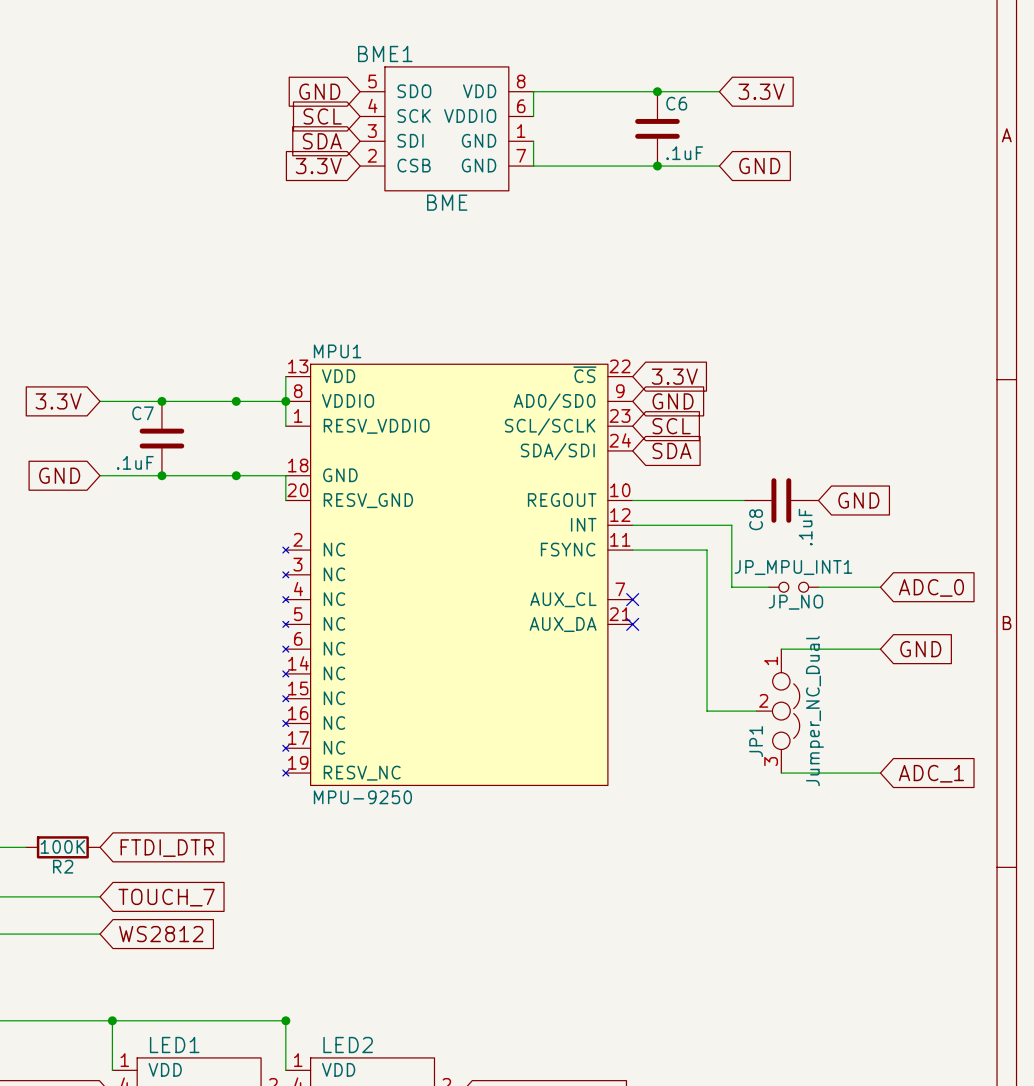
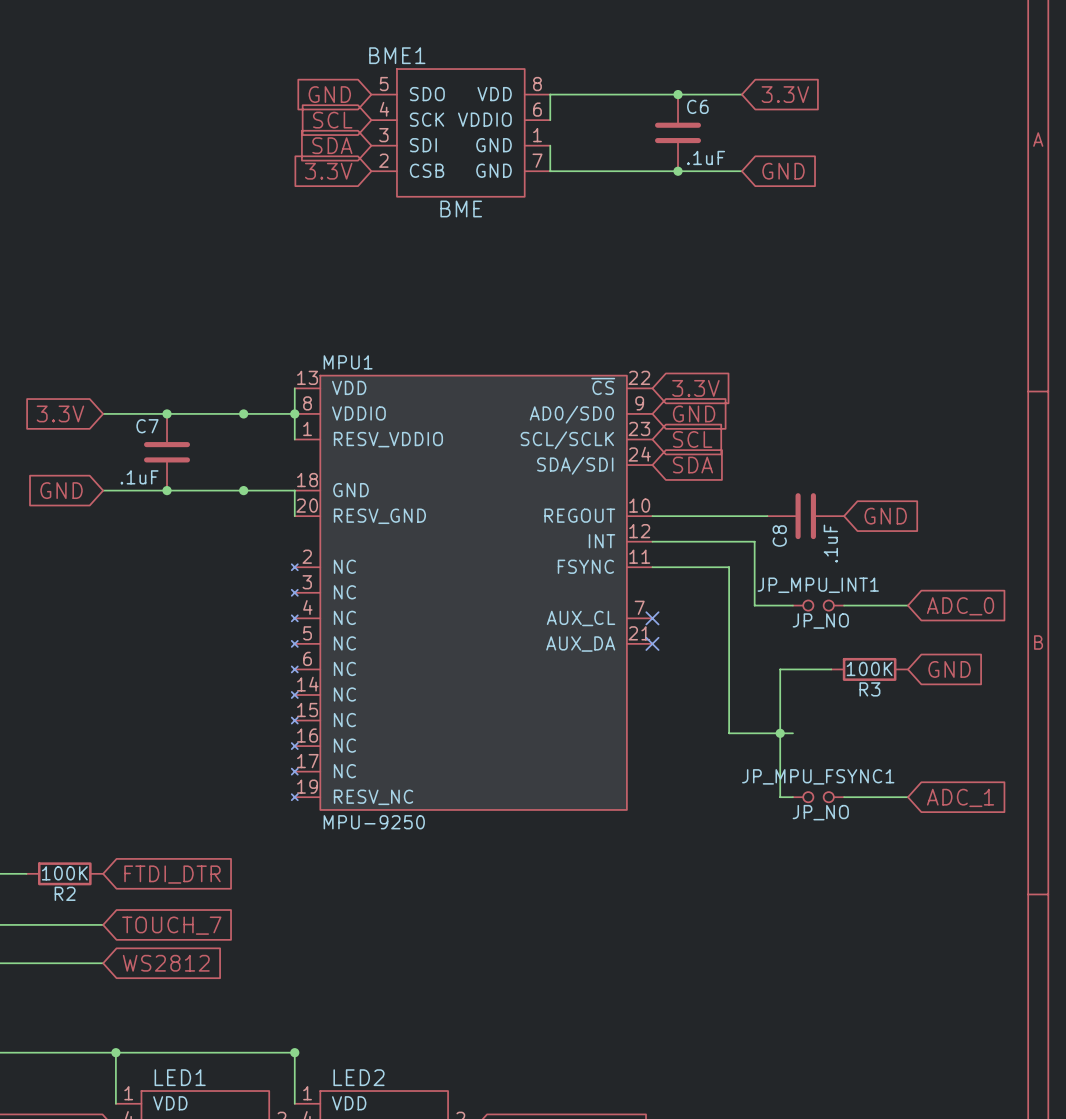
wire: none -> (805, 669) (780, 669) (780, 797) (792, 797)
R3: none -> 100K (869, 669)
junction: none -> (780, 733)
JP1: Jumper_NC_Dual (778, 711) -> none
wire: (781, 773) (818, 773) -> none
JP_MPU_FSYNC1: none -> JP_NO (818, 797)

